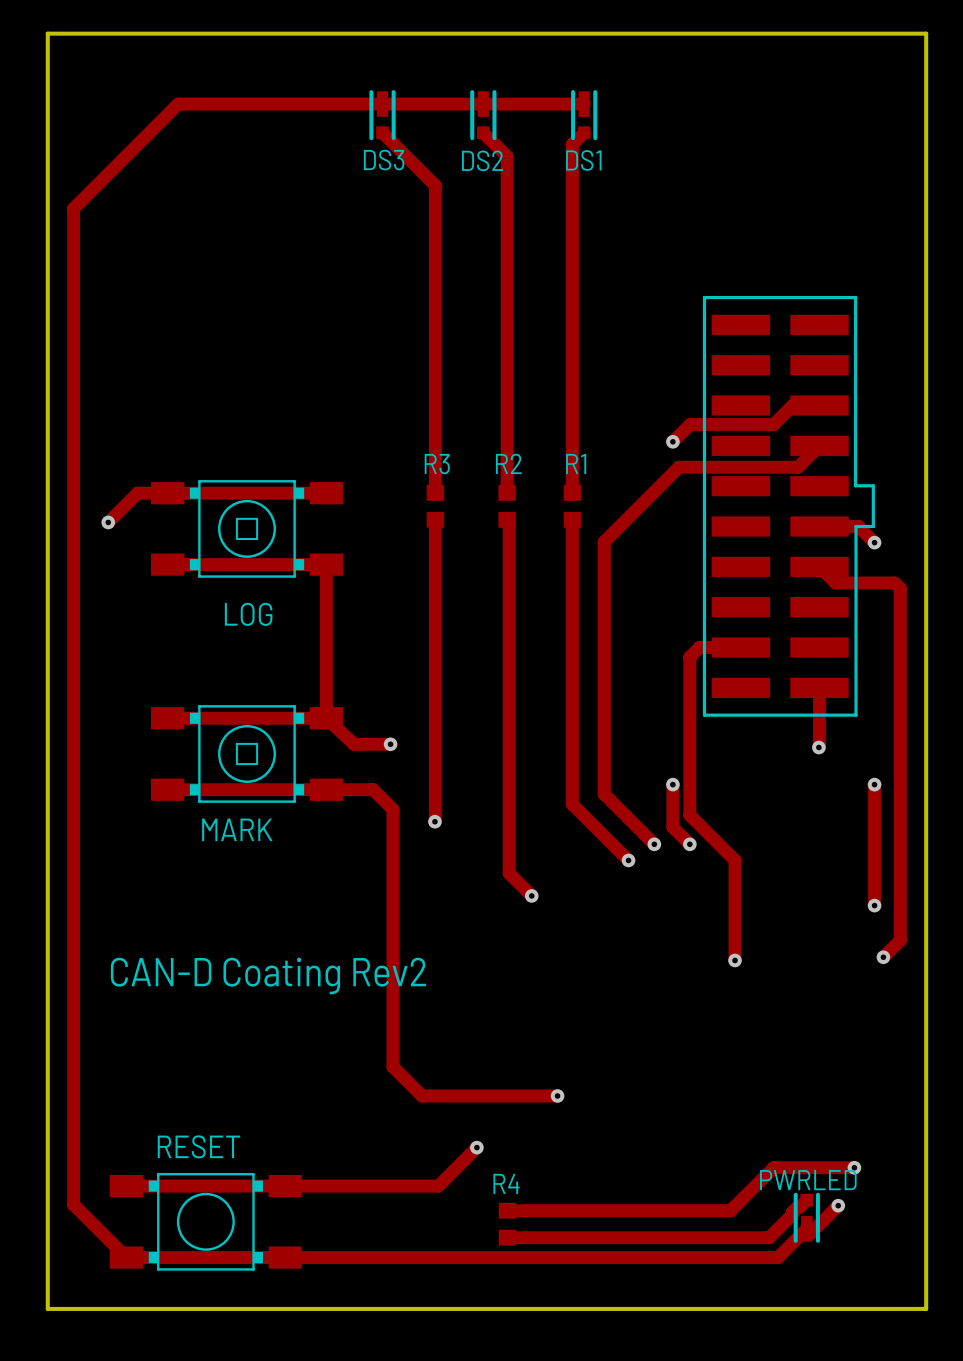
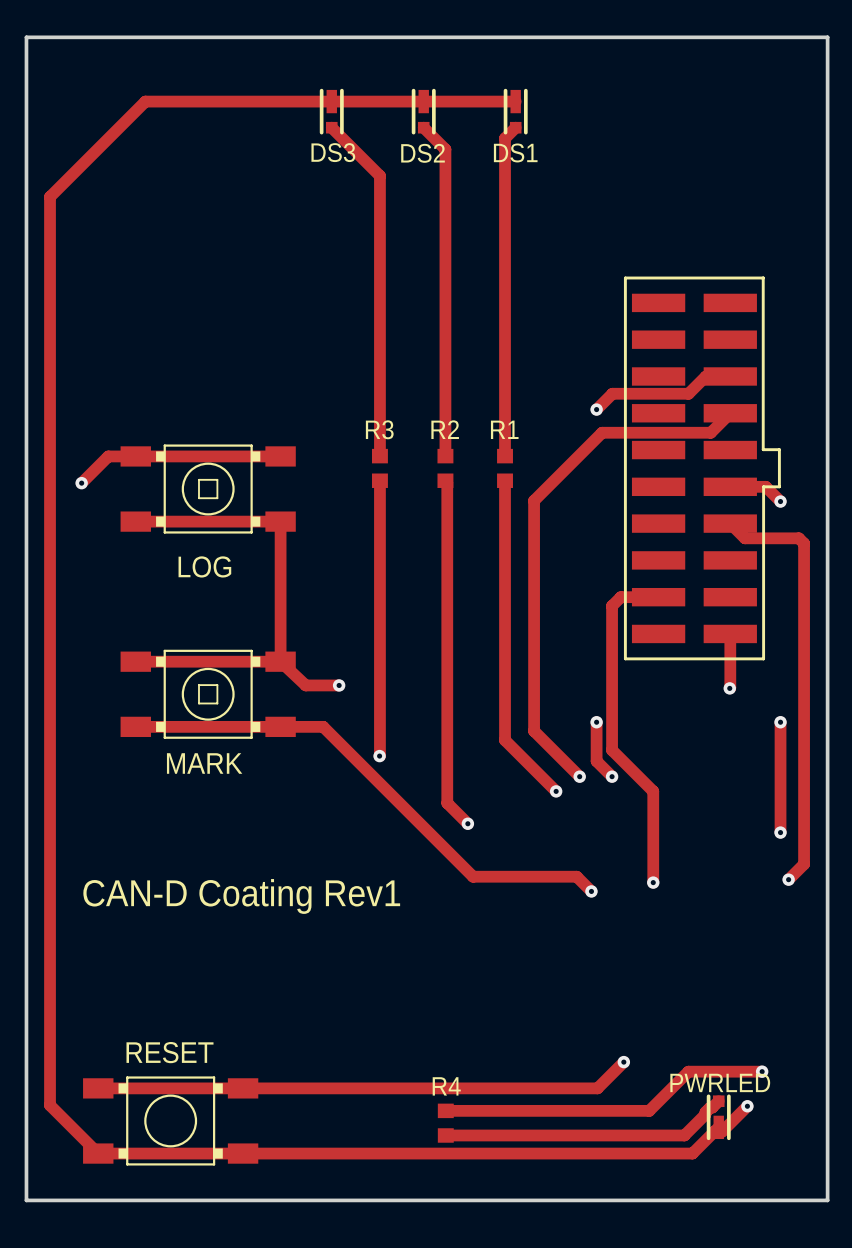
track: (393, 809) (393, 1066) (422, 1095) (557, 1095) -> (341, 744) (473, 876) (576, 876) (591, 891)
via: none -> (591, 891)
text: CAN-D Coating Rev2 (268, 975) -> CAN-D Coating Rev1 (241, 896)
via: (557, 1095) -> none
track: (476, 1147) (438, 1186) -> (623, 1062) (597, 1088) (382, 1088)
via: (476, 1147) -> none
via: none -> (623, 1062)

